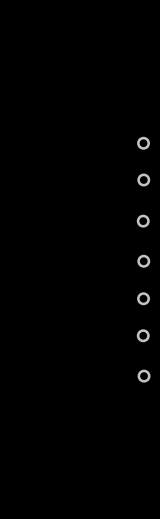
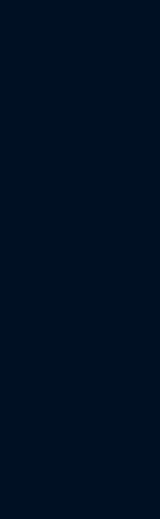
via: (143, 143) -> none
via: (143, 180) -> none
via: (143, 221) -> none
via: (143, 261) -> none
via: (143, 298) -> none
via: (143, 335) -> none
via: (144, 376) -> none

